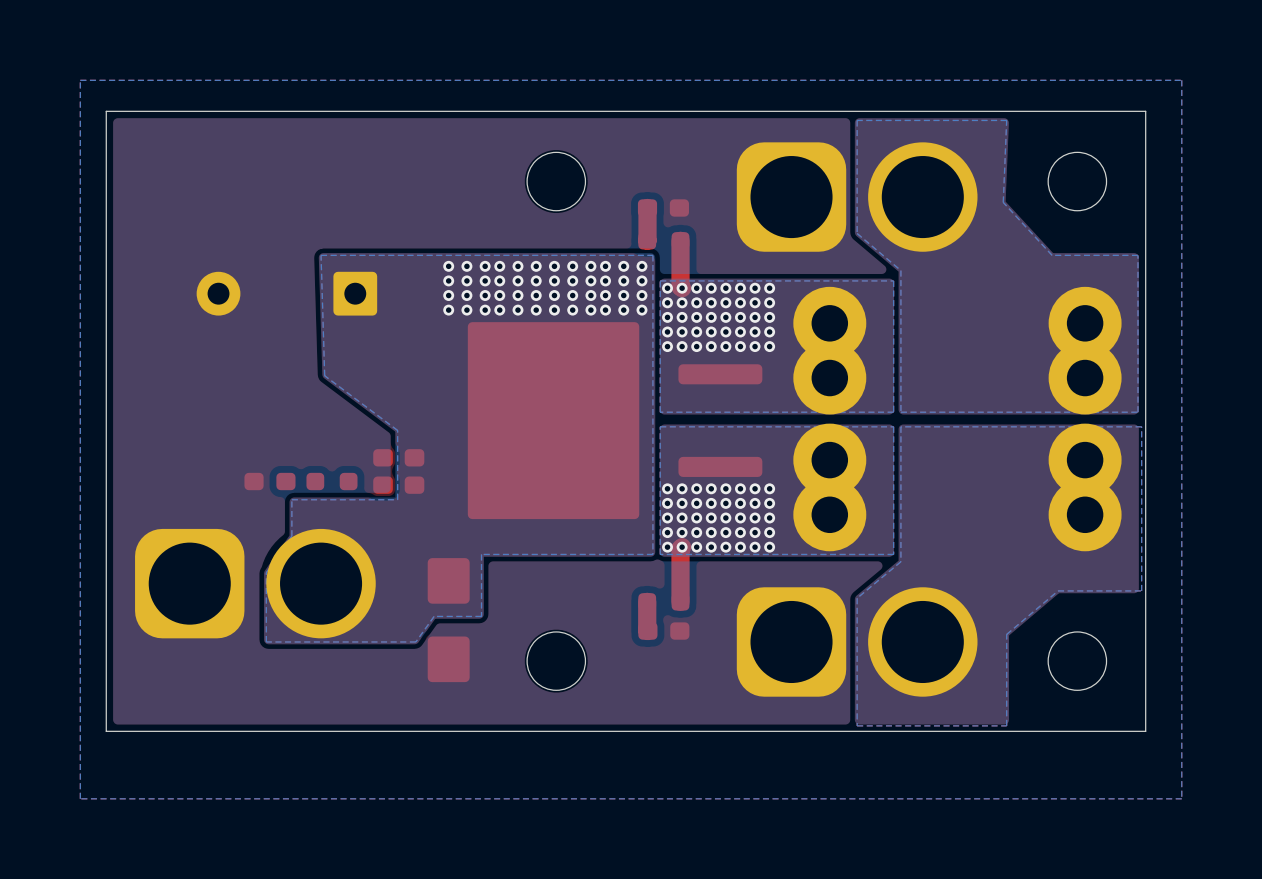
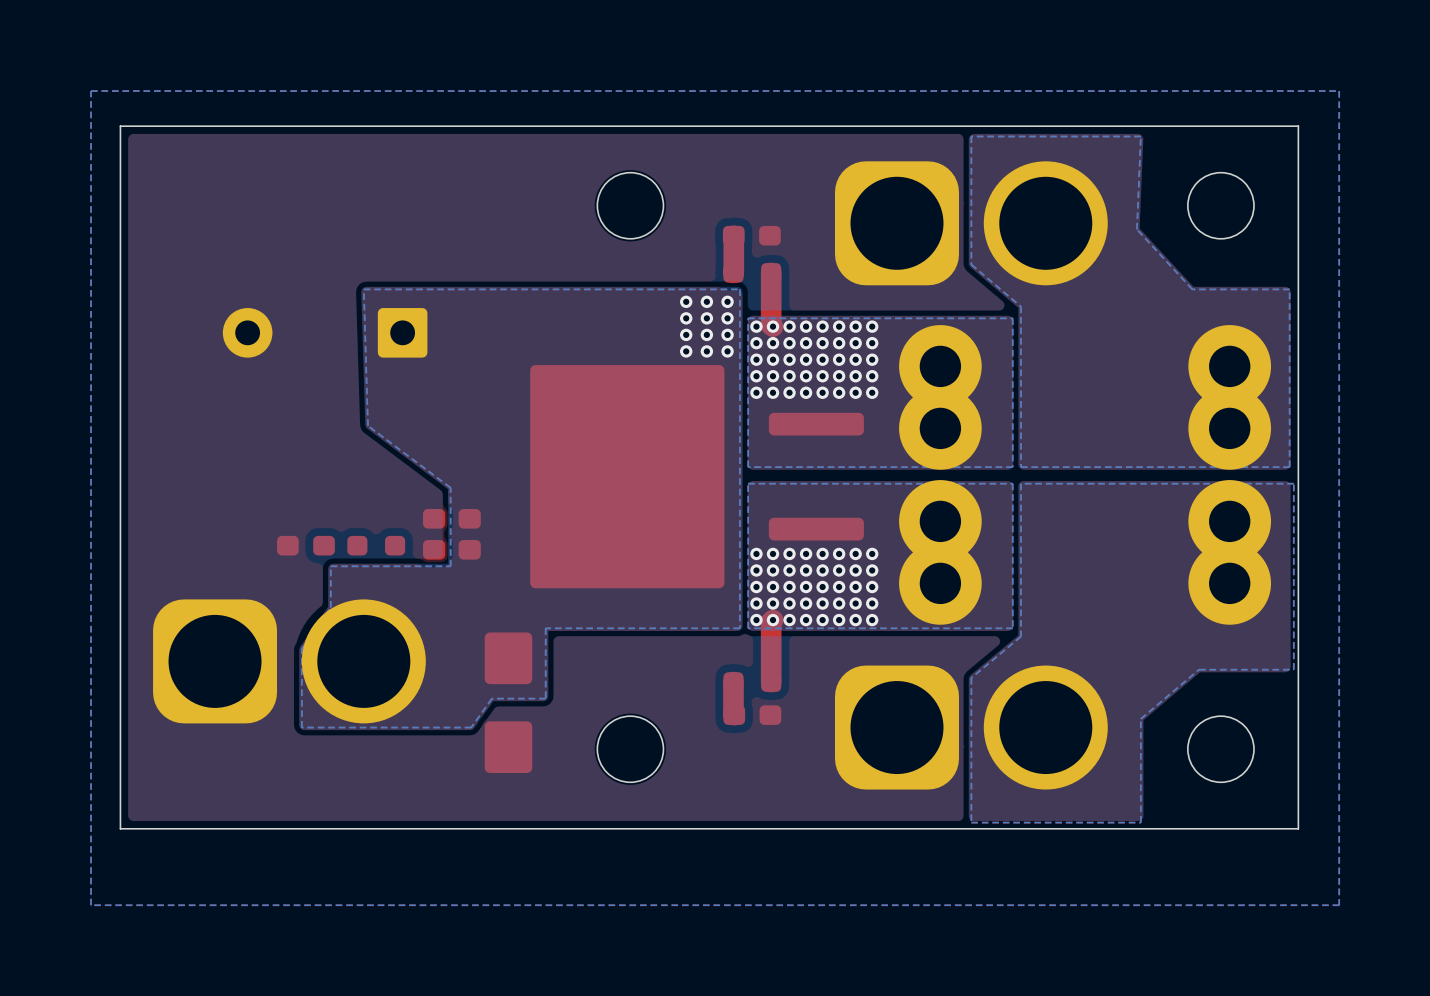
via: (448, 266) -> none
via: (466, 266) -> none
via: (485, 266) -> none
via: (499, 266) -> none
via: (517, 266) -> none
via: (536, 266) -> none
via: (554, 266) -> none
via: (572, 266) -> none
via: (590, 266) -> none
via: (448, 280) -> none
via: (466, 280) -> none
via: (485, 280) -> none
via: (499, 280) -> none
via: (517, 280) -> none
via: (536, 280) -> none
via: (554, 280) -> none
via: (572, 280) -> none
via: (590, 280) -> none
via: (448, 295) -> none
via: (466, 295) -> none
via: (485, 295) -> none
via: (499, 295) -> none
via: (517, 295) -> none
via: (536, 295) -> none
via: (554, 295) -> none
via: (572, 295) -> none
via: (590, 295) -> none
via: (448, 310) -> none
via: (466, 310) -> none
via: (485, 310) -> none
via: (499, 310) -> none
via: (517, 310) -> none
via: (536, 310) -> none
via: (554, 310) -> none
via: (572, 310) -> none
via: (590, 310) -> none

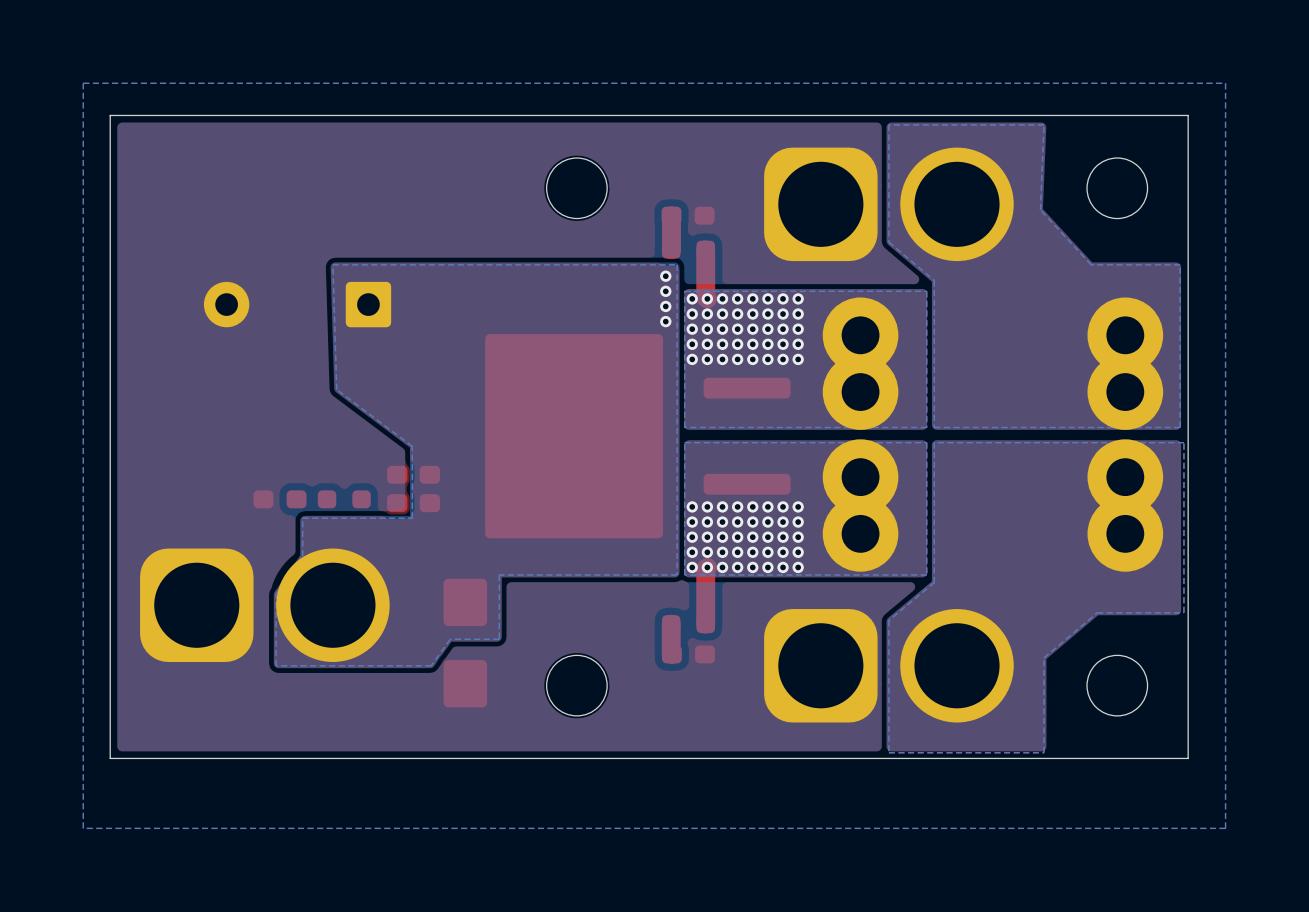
via: (686, 301) -> none
via: (706, 301) -> none
via: (686, 318) -> none
via: (706, 318) -> none
via: (686, 334) -> none
via: (706, 334) -> none
via: (686, 351) -> none
via: (706, 351) -> none

